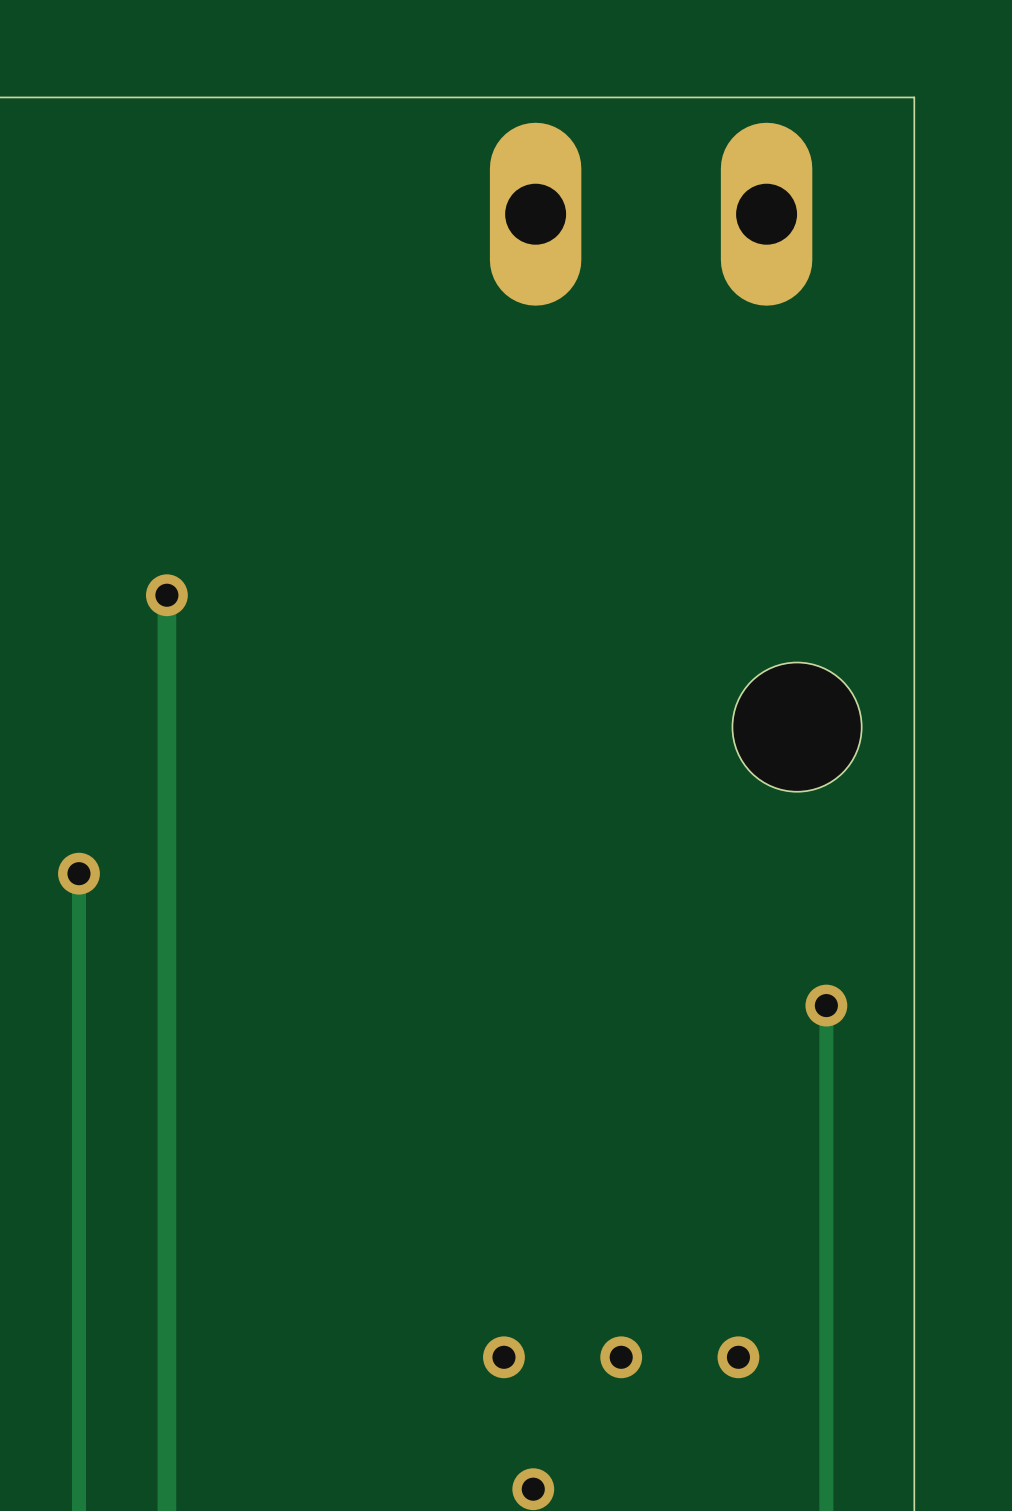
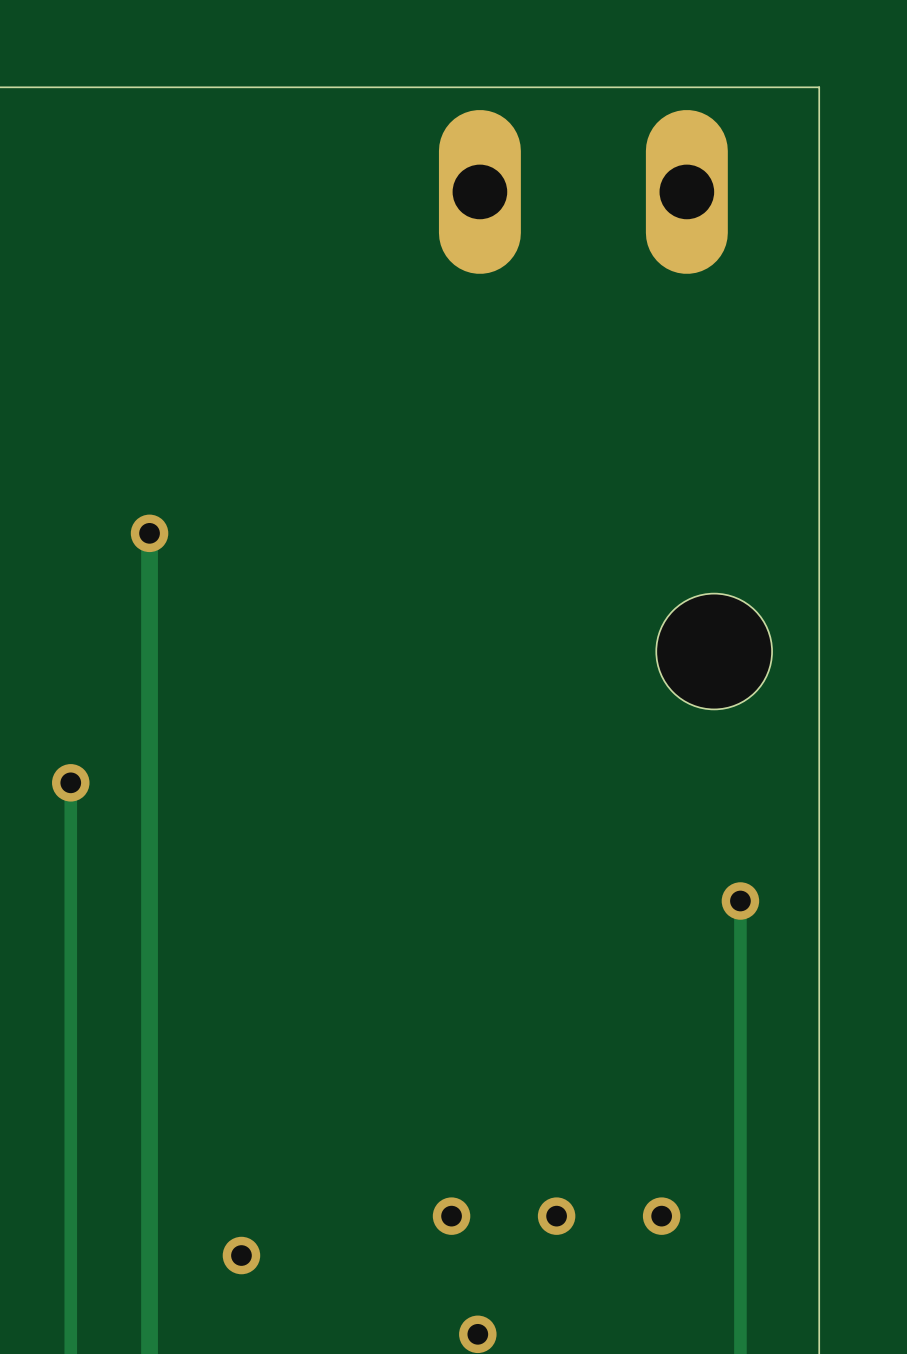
via: none -> (241, 1255)

